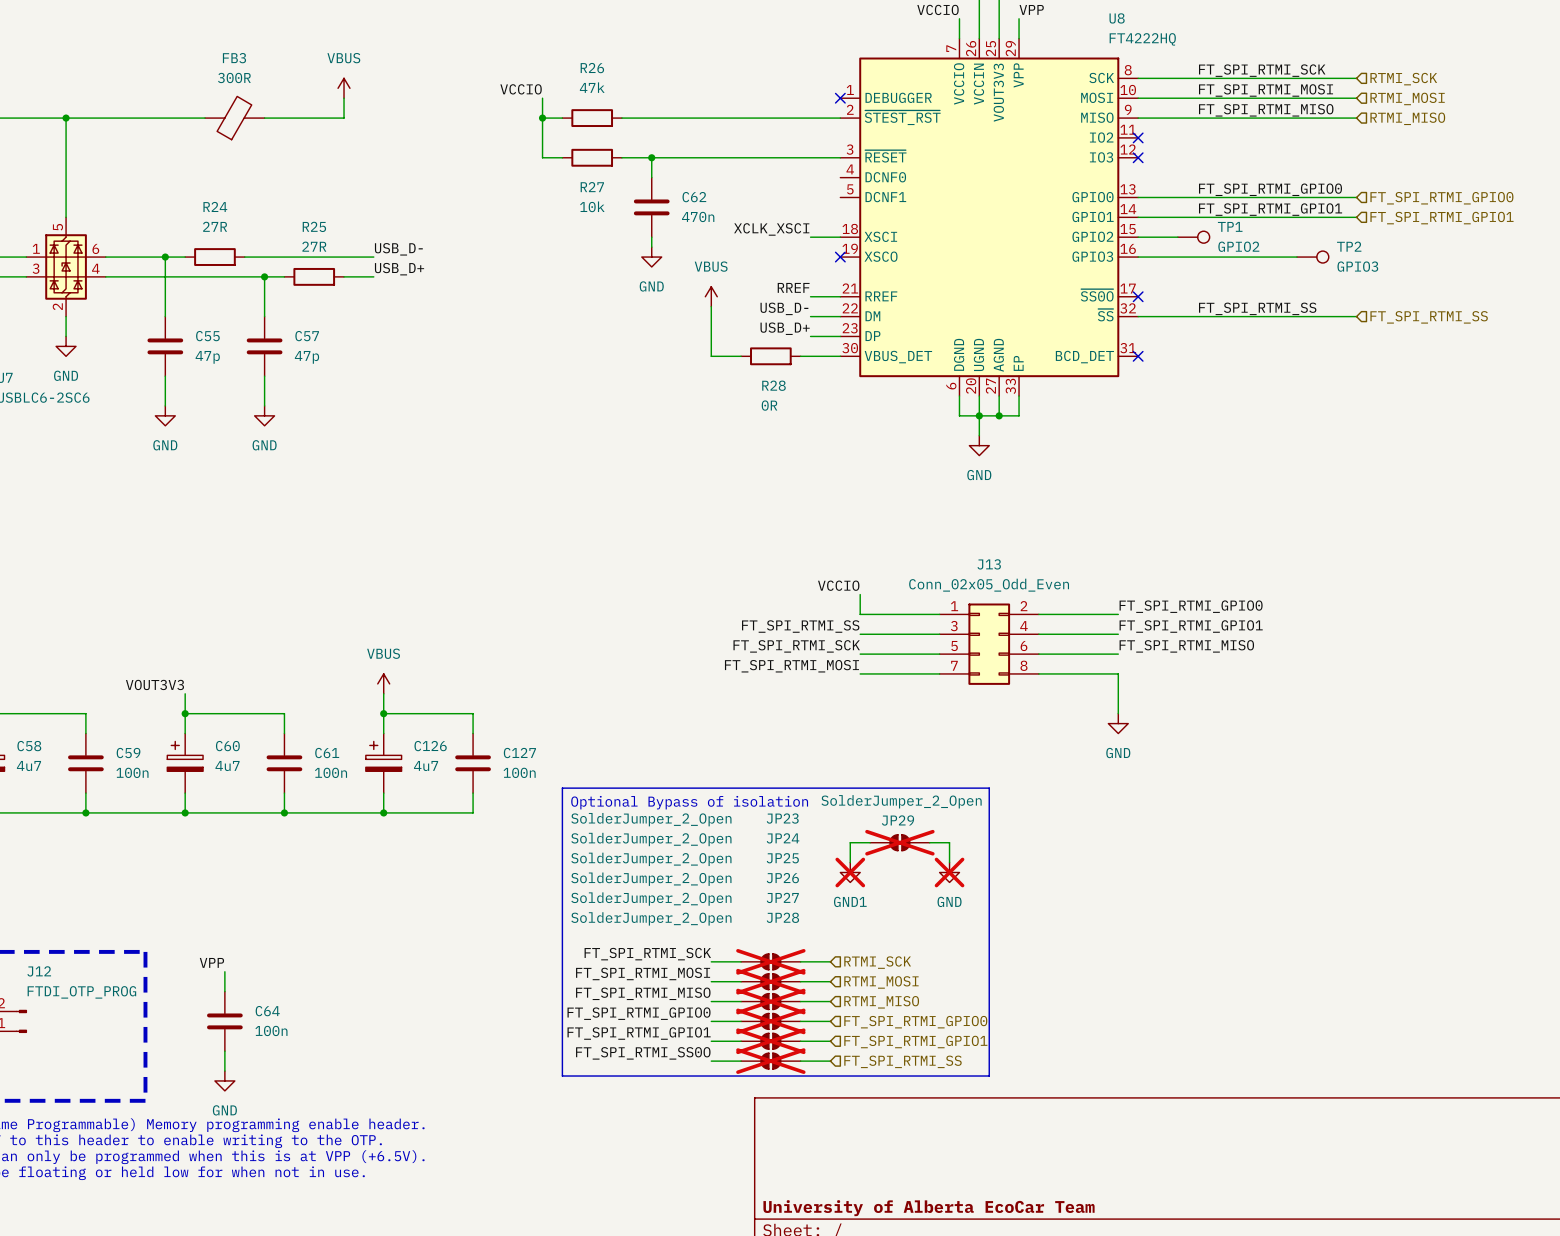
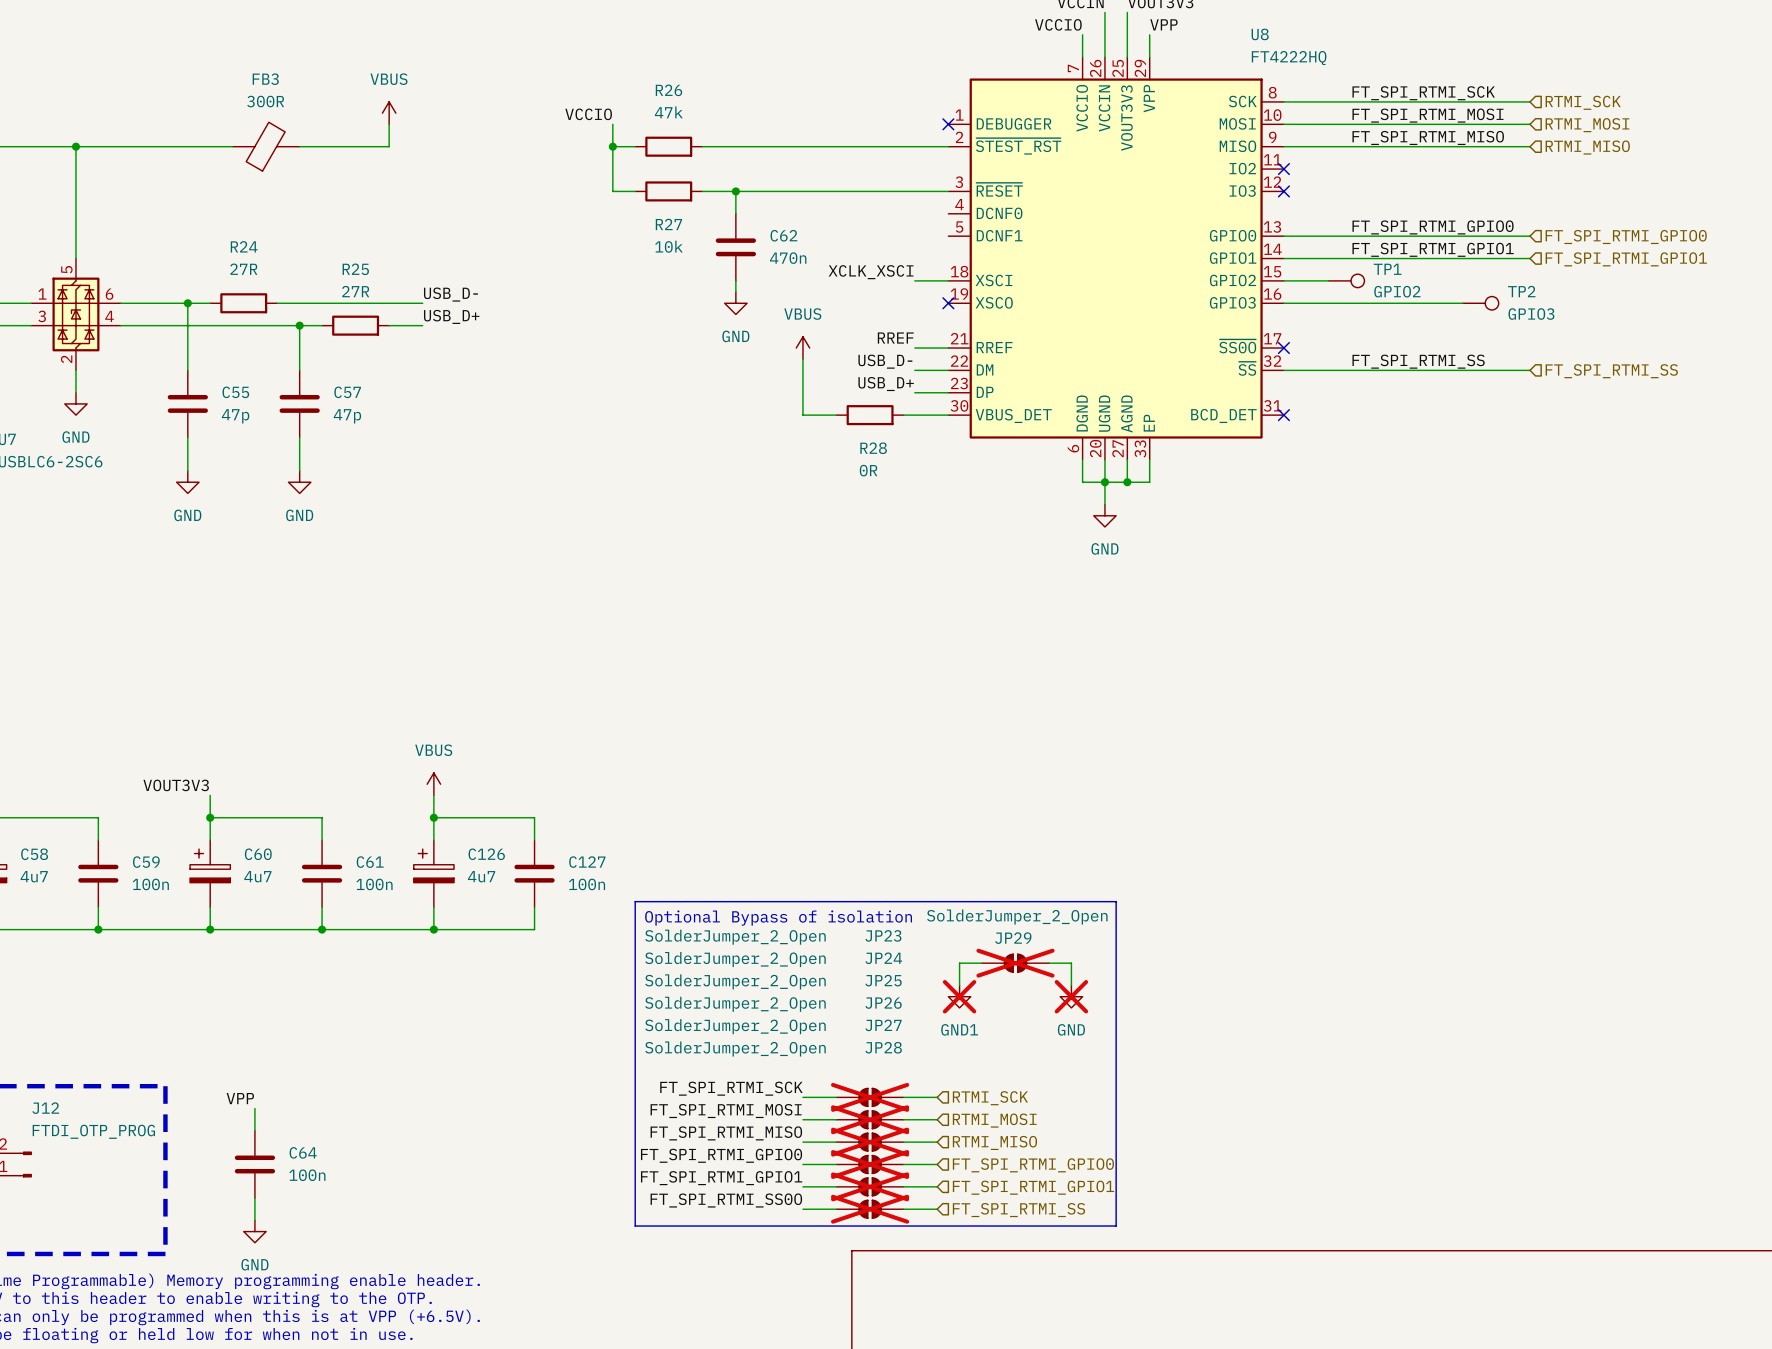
label: VCCIO (838, 585) -> none
wire: (860, 594) (860, 614) (939, 614) -> none
label: FT_SPI_RTMI_GPIO0 (1191, 606) -> none
wire: (1038, 614) (1118, 614) -> none
label: FT_SPI_RTMI_SS (800, 626) -> none
label: FT_SPI_RTMI_GPIO1 (1191, 626) -> none
wire: (860, 634) (939, 634) -> none
wire: (1038, 634) (1118, 634) -> none
J13: Conn_02x05_Odd_Even (989, 644) -> none
label: FT_SPI_RTMI_SCK (796, 646) -> none
label: FT_SPI_RTMI_MISO (1186, 646) -> none
wire: (860, 654) (939, 654) -> none
wire: (1038, 654) (1118, 654) -> none
label: FT_SPI_RTMI_MOSI (791, 666) -> none
wire: (860, 673) (939, 673) -> none
wire: (1038, 673) (1118, 673) (1118, 713) -> none
power symbol: GND (1118, 723) -> none

